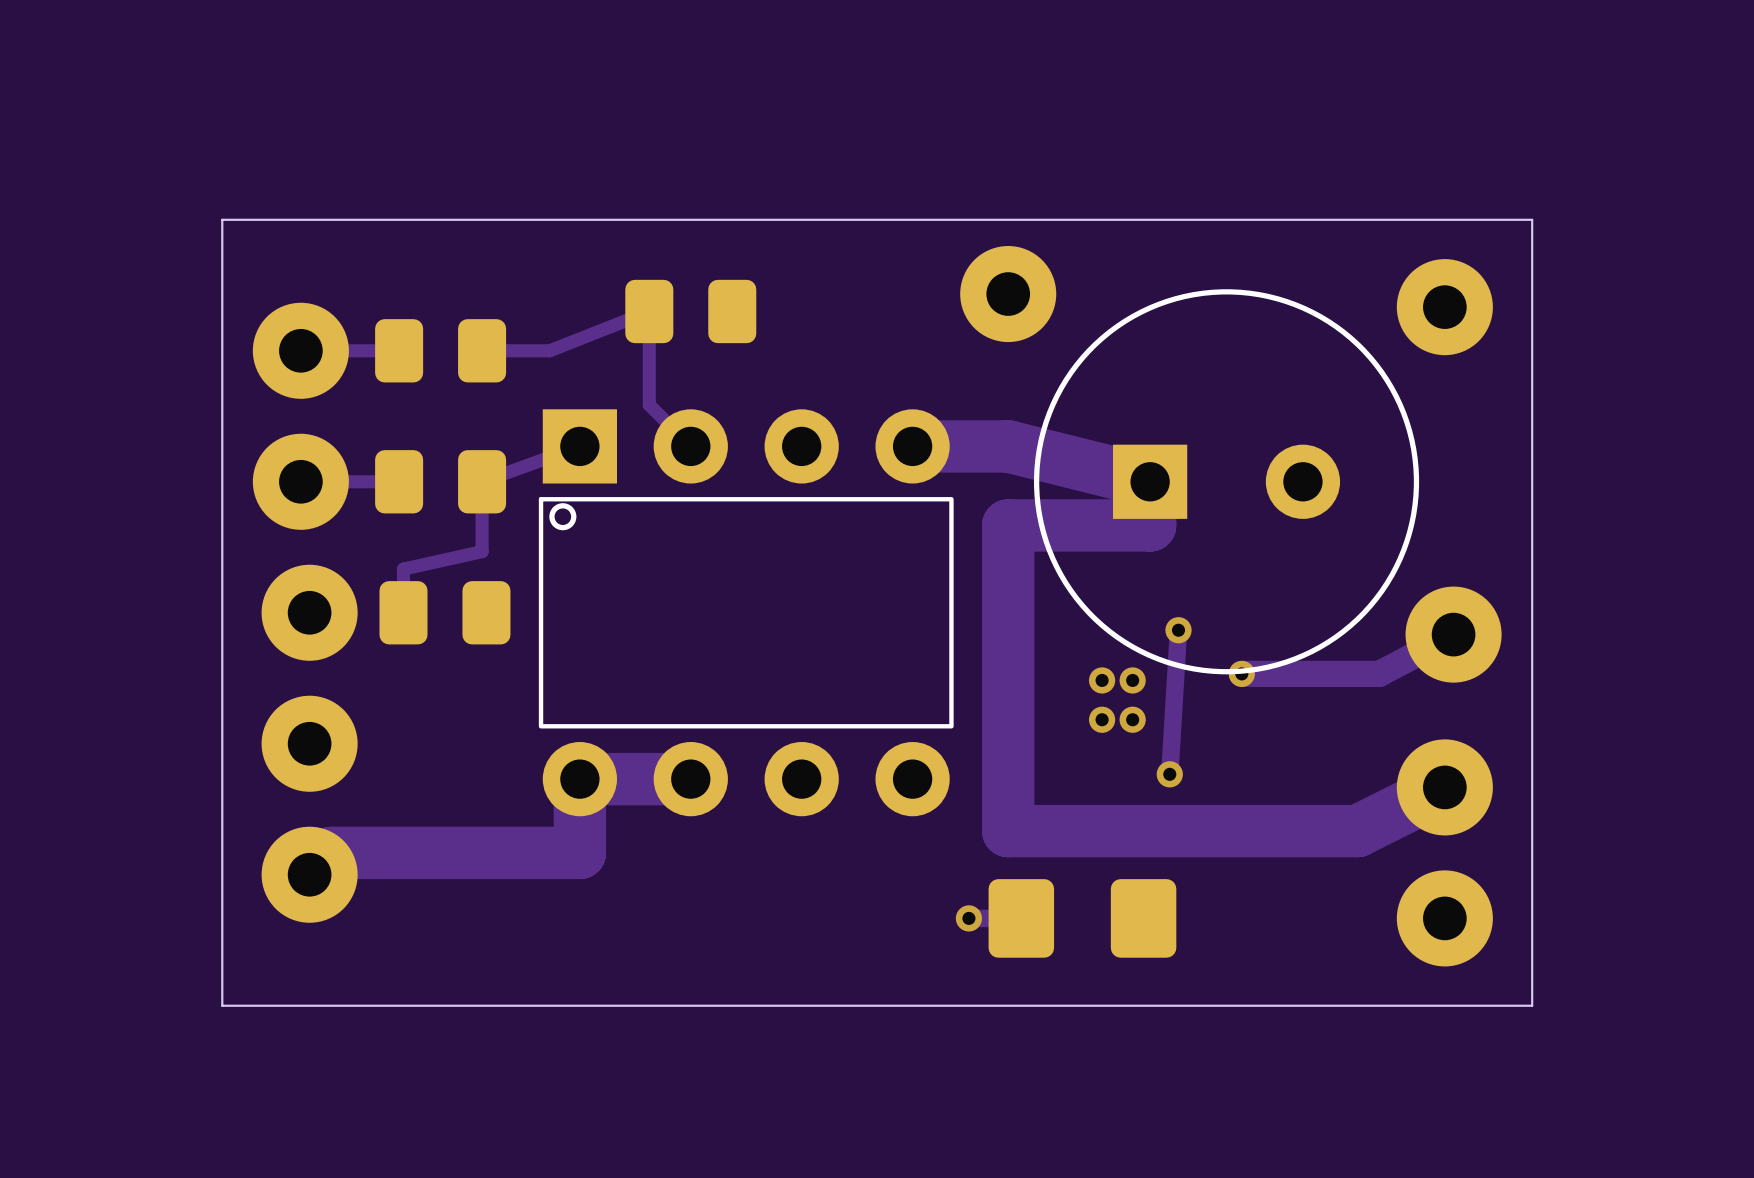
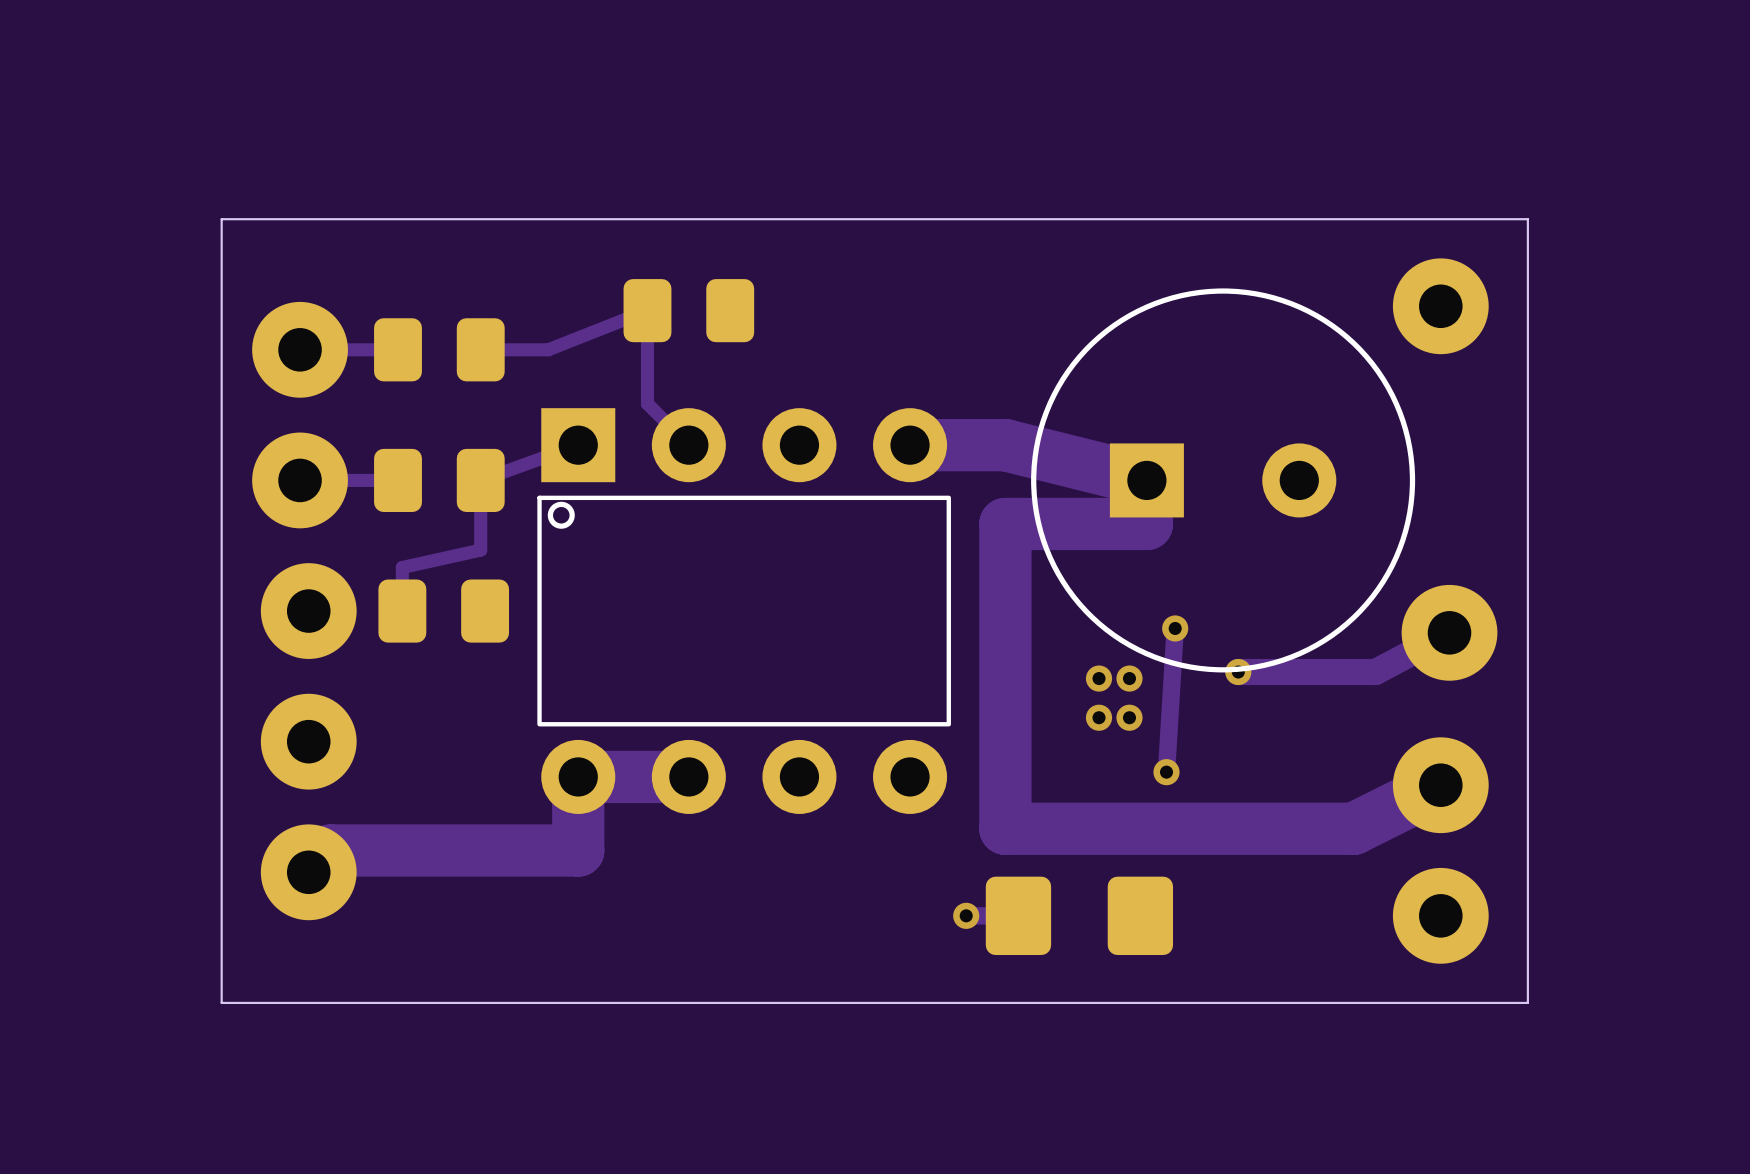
part: (1008, 294) -> none

